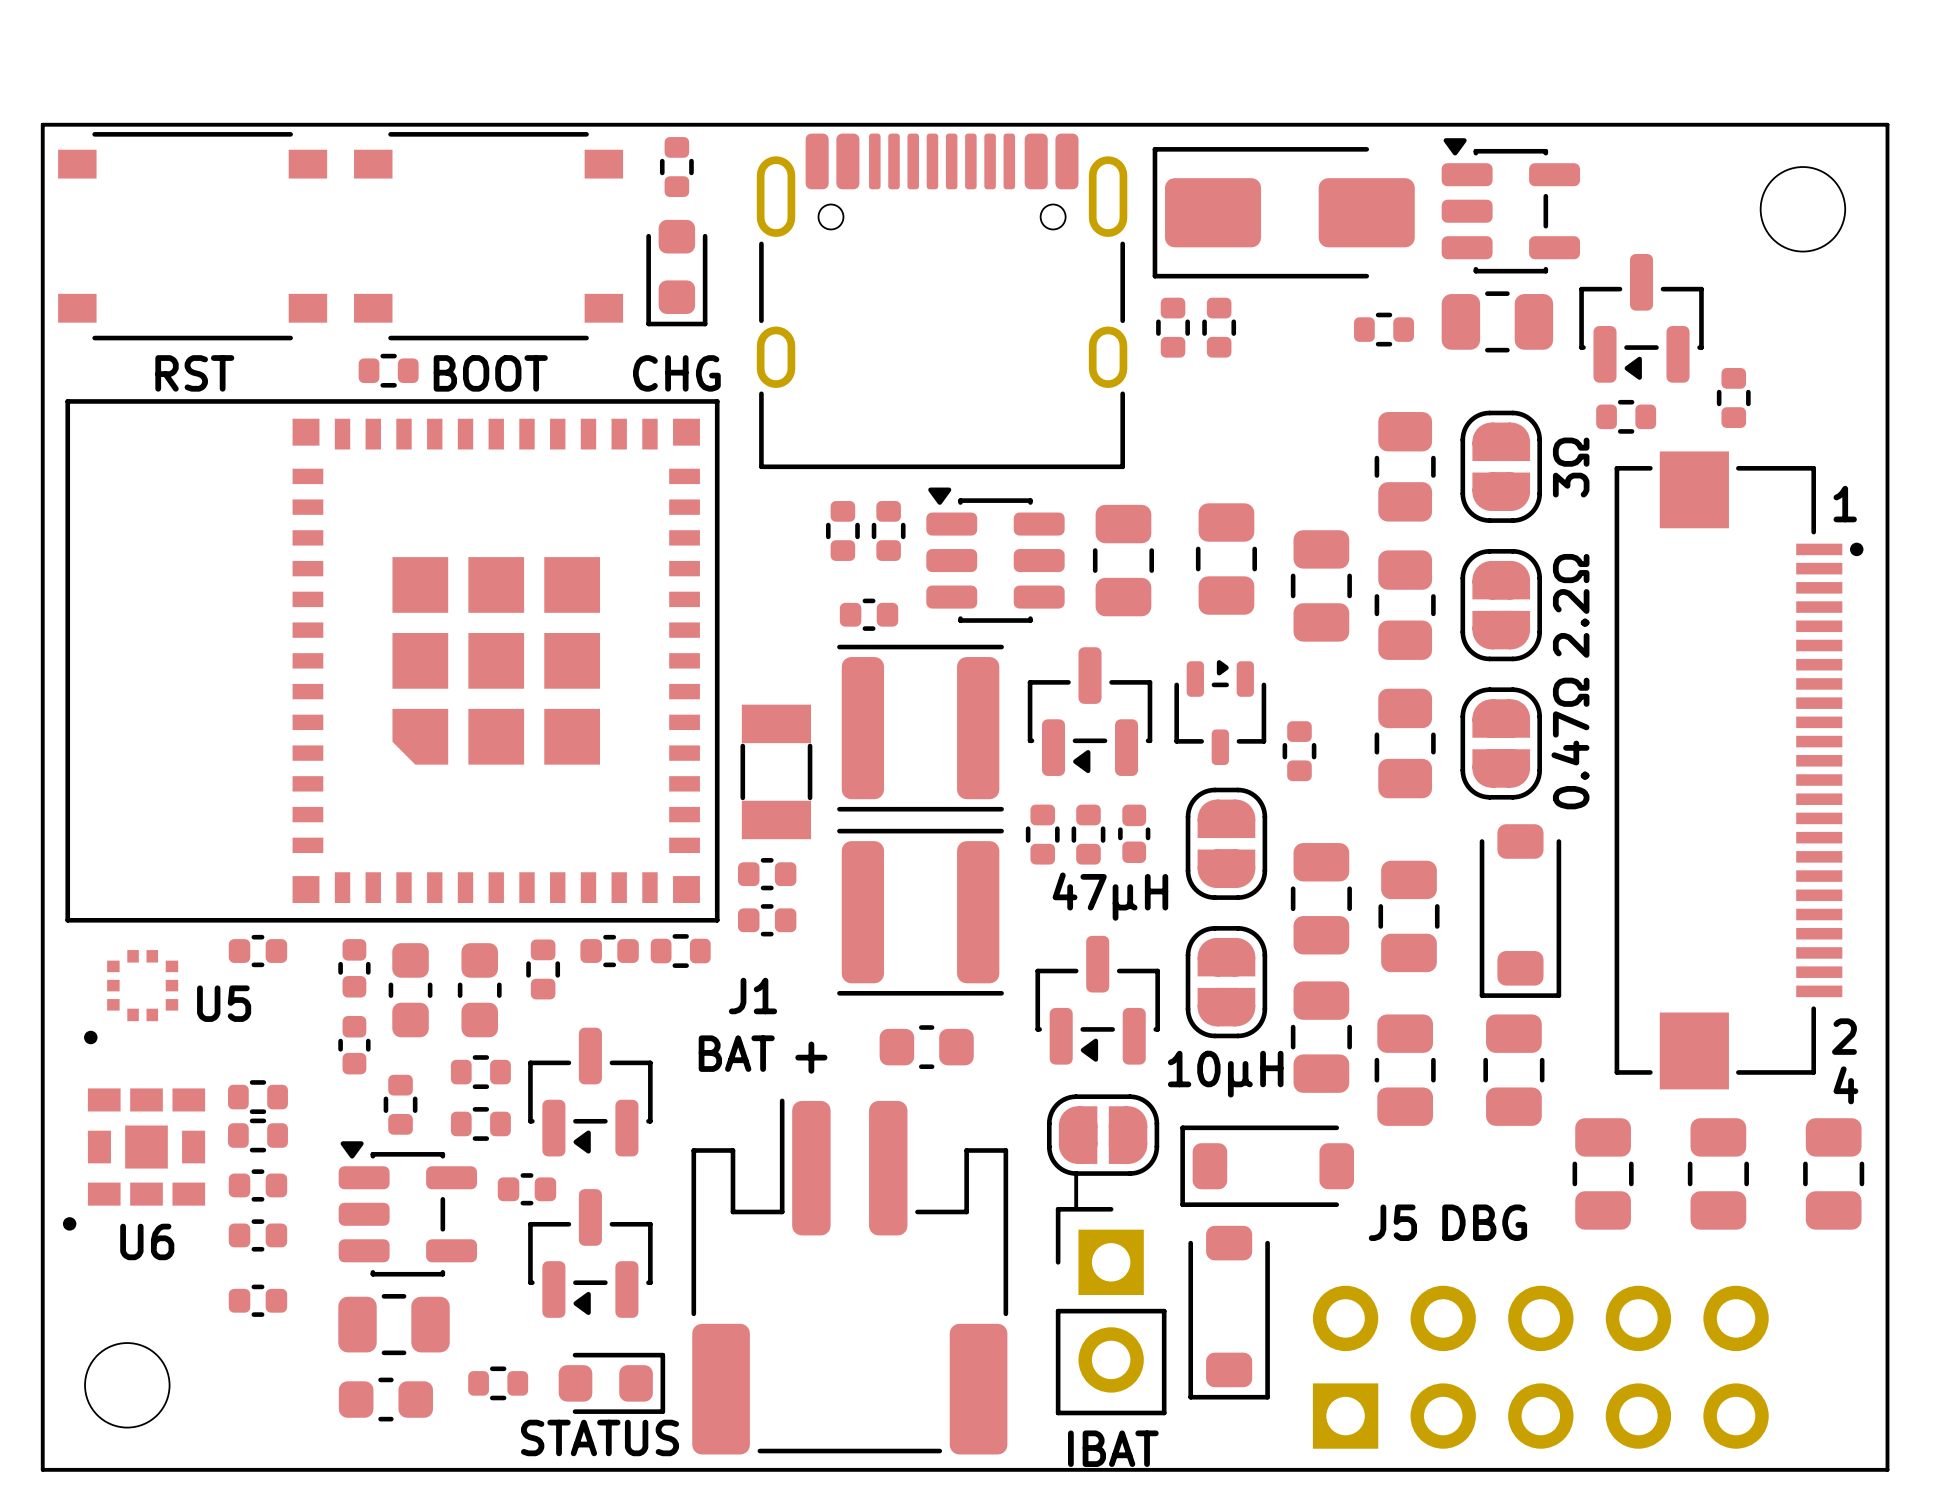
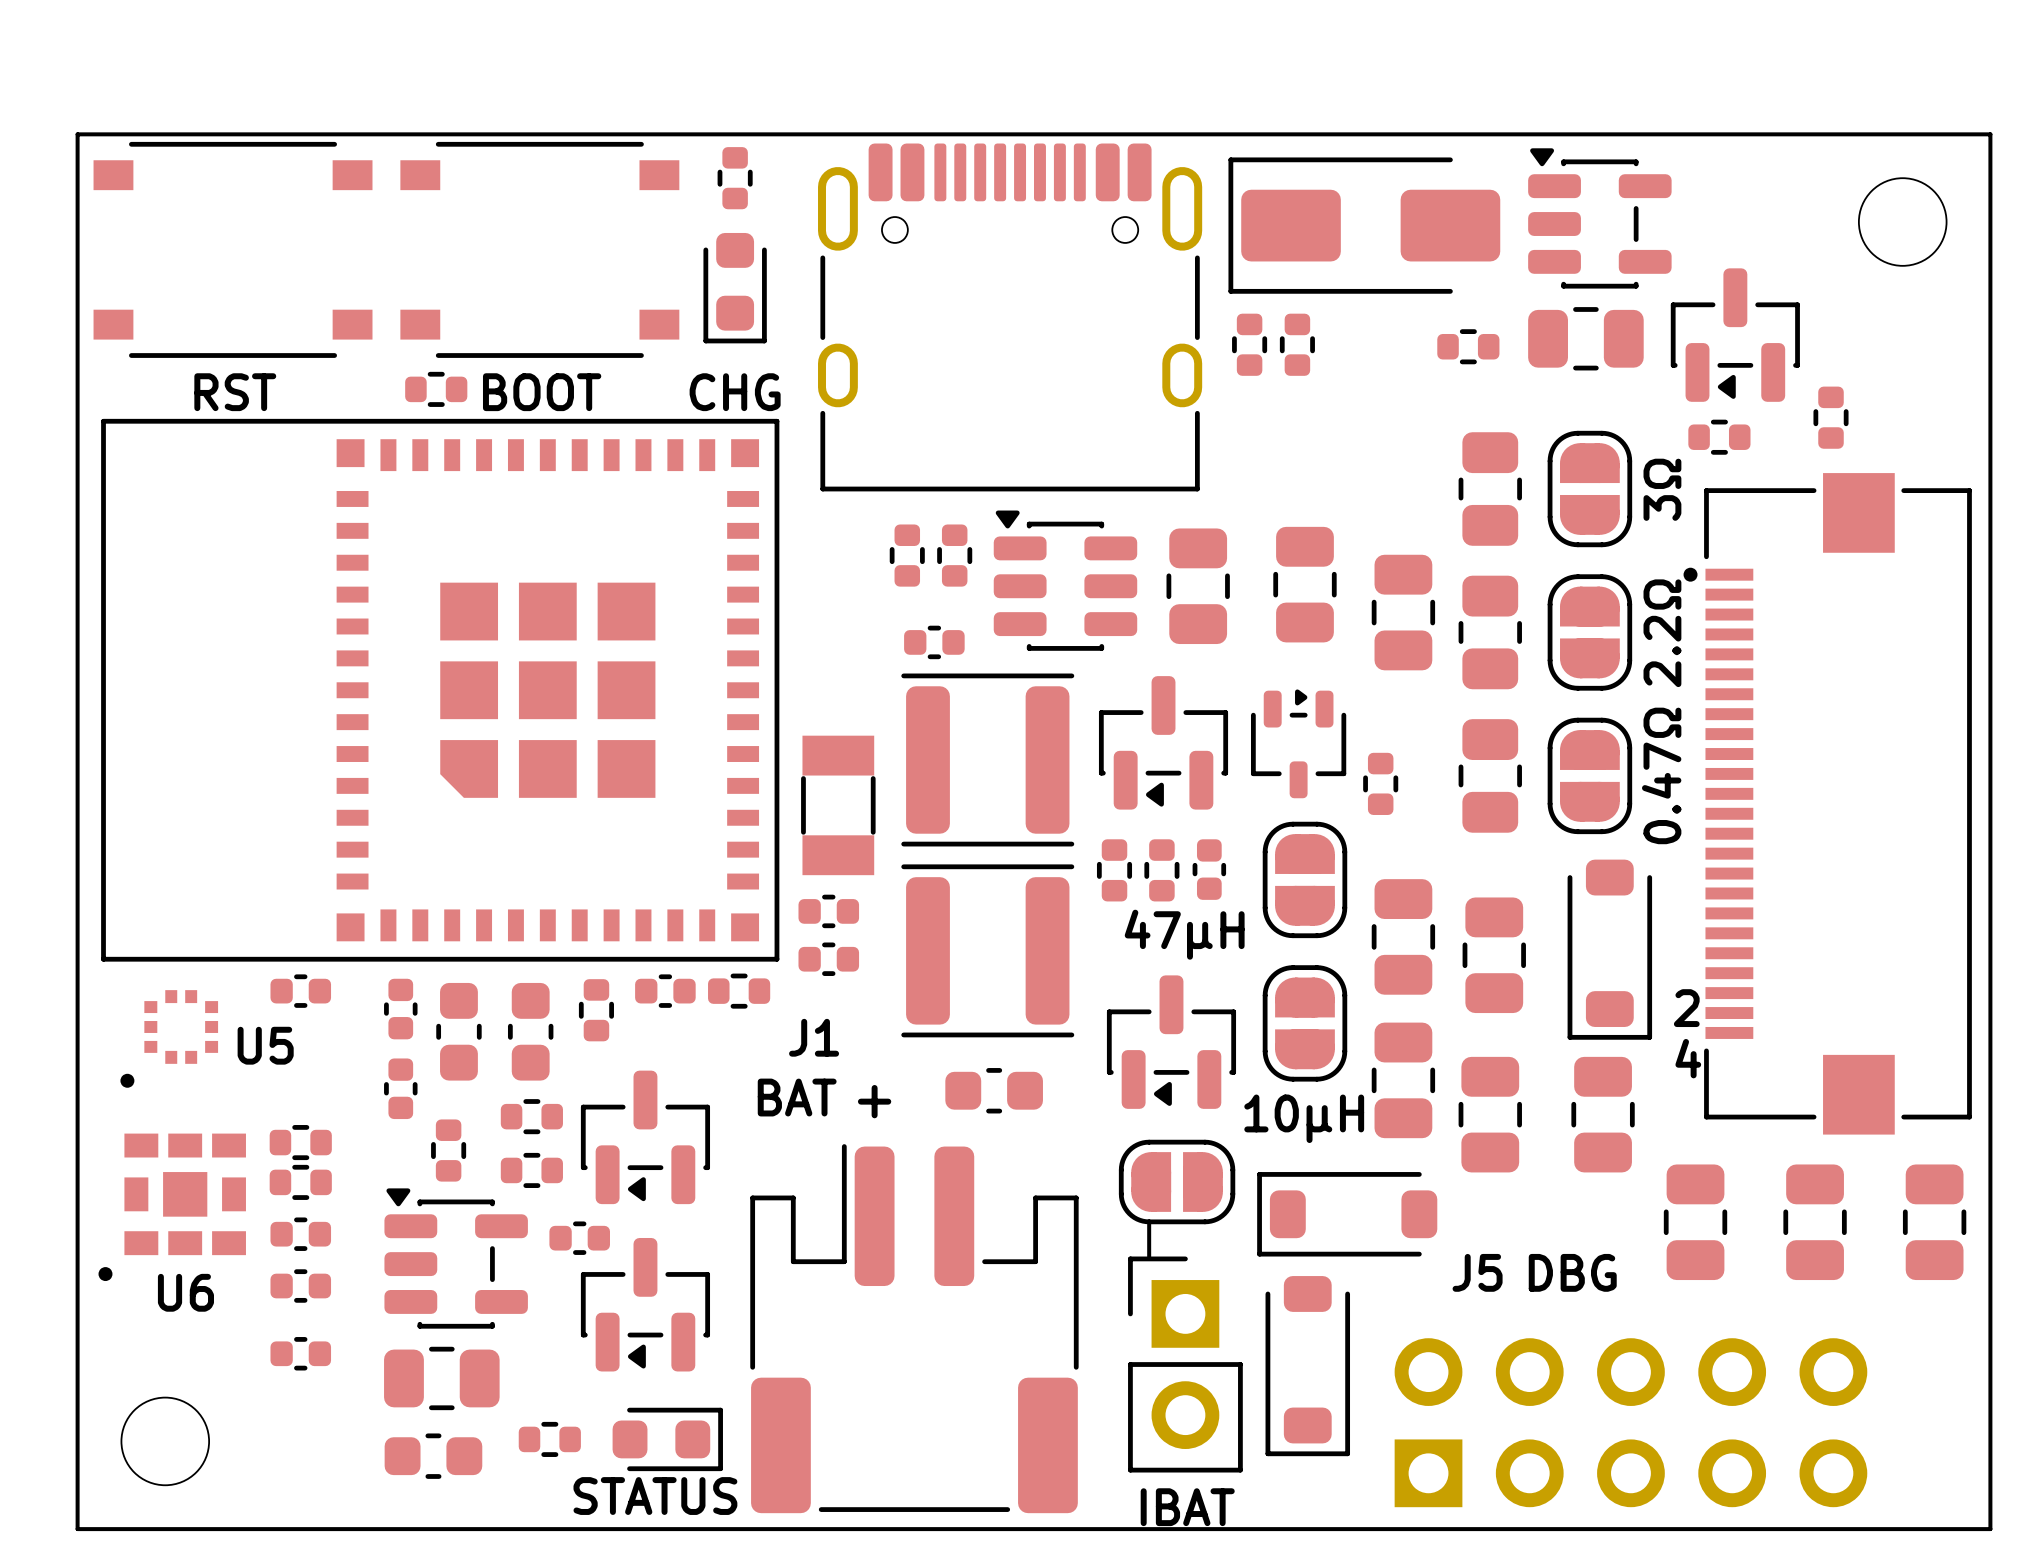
part footprint: [1614, 451, 1864, 1090] -> [1683, 473, 1972, 1135]
text: 1 (1845, 504) -> none
text position: 2 (1844, 1036) -> 2 (1686, 1008)
text position: 4 (1845, 1085) -> 4 (1688, 1058)

